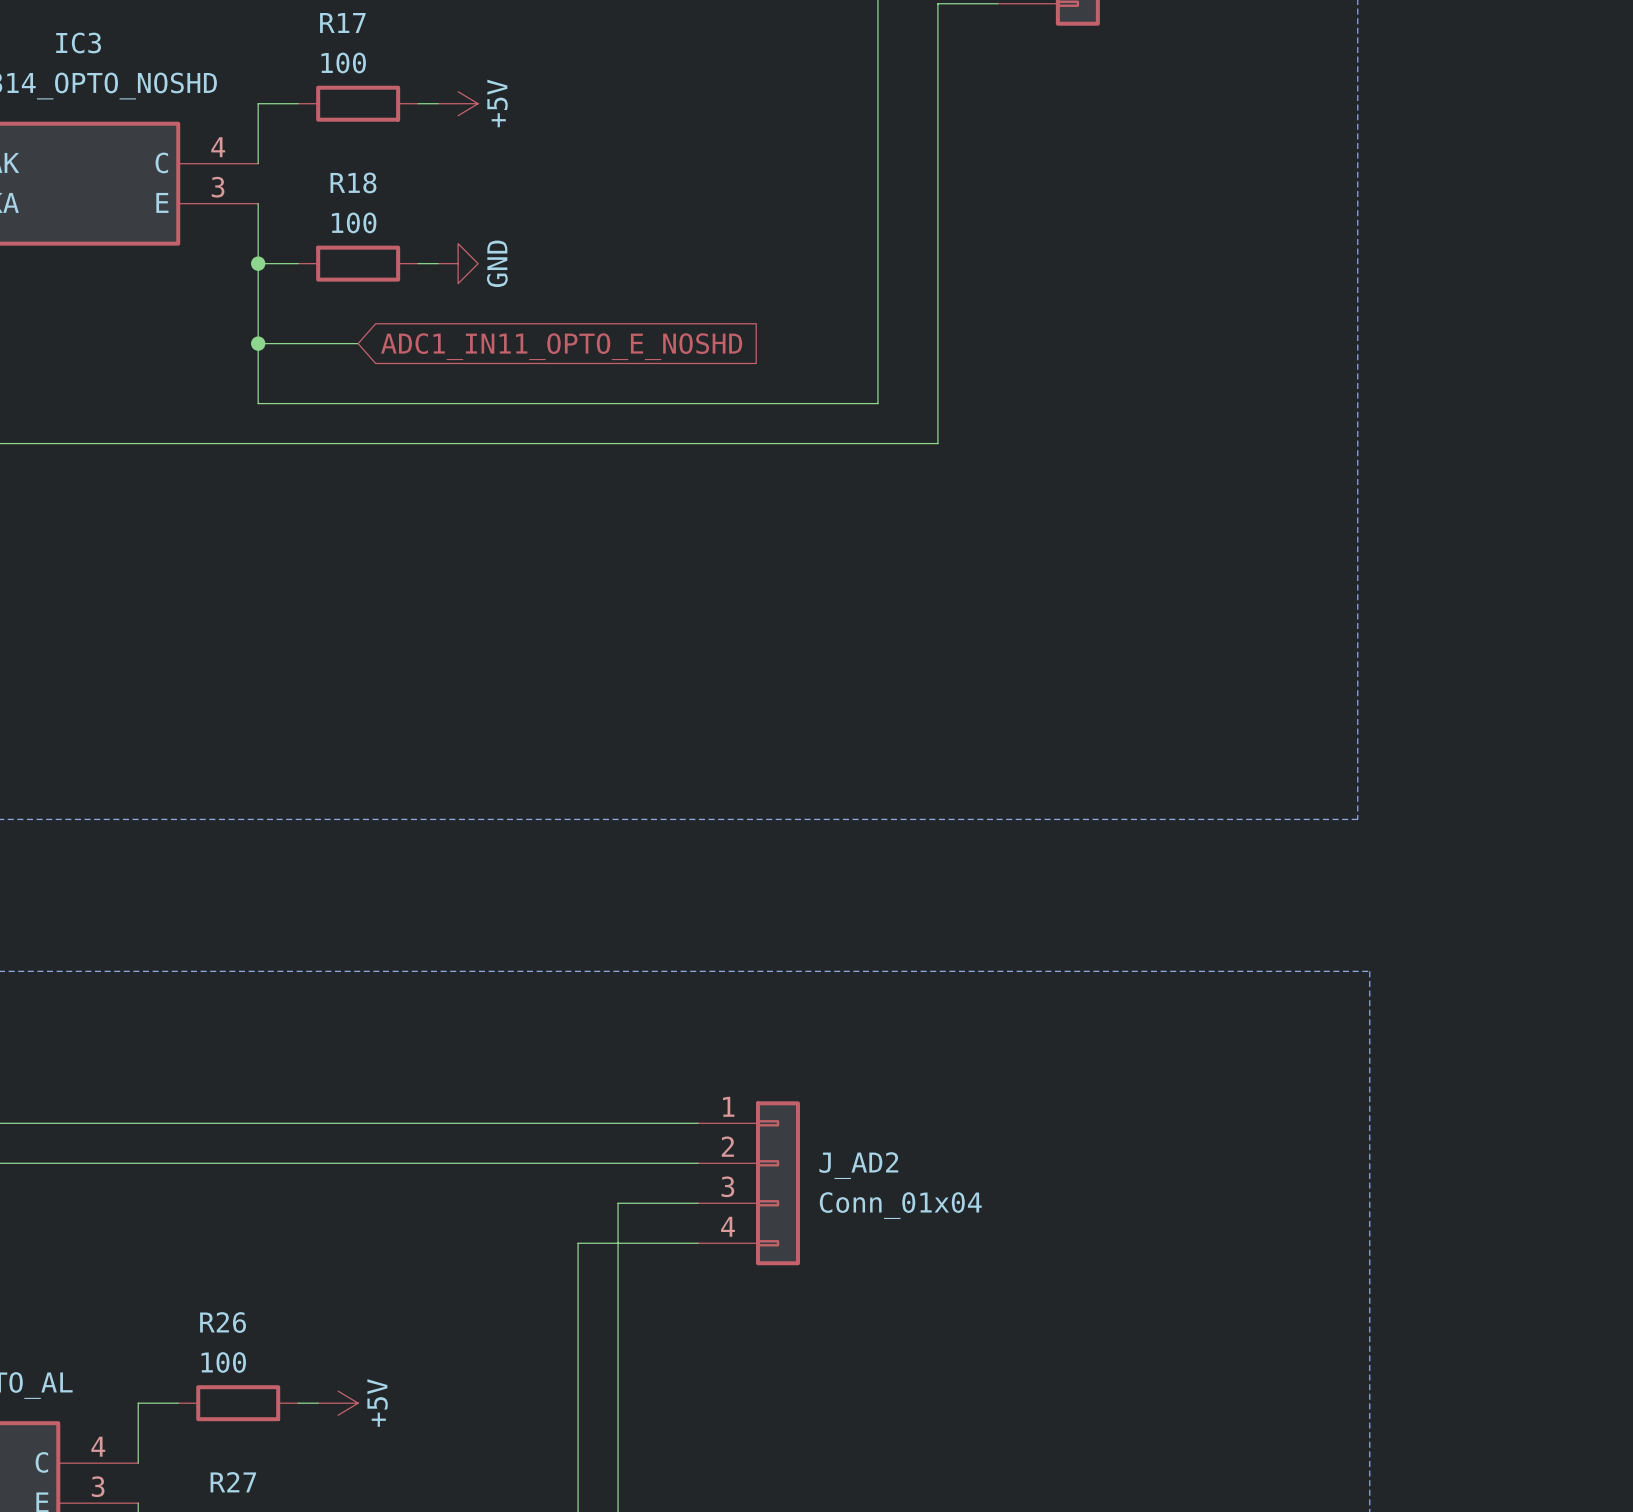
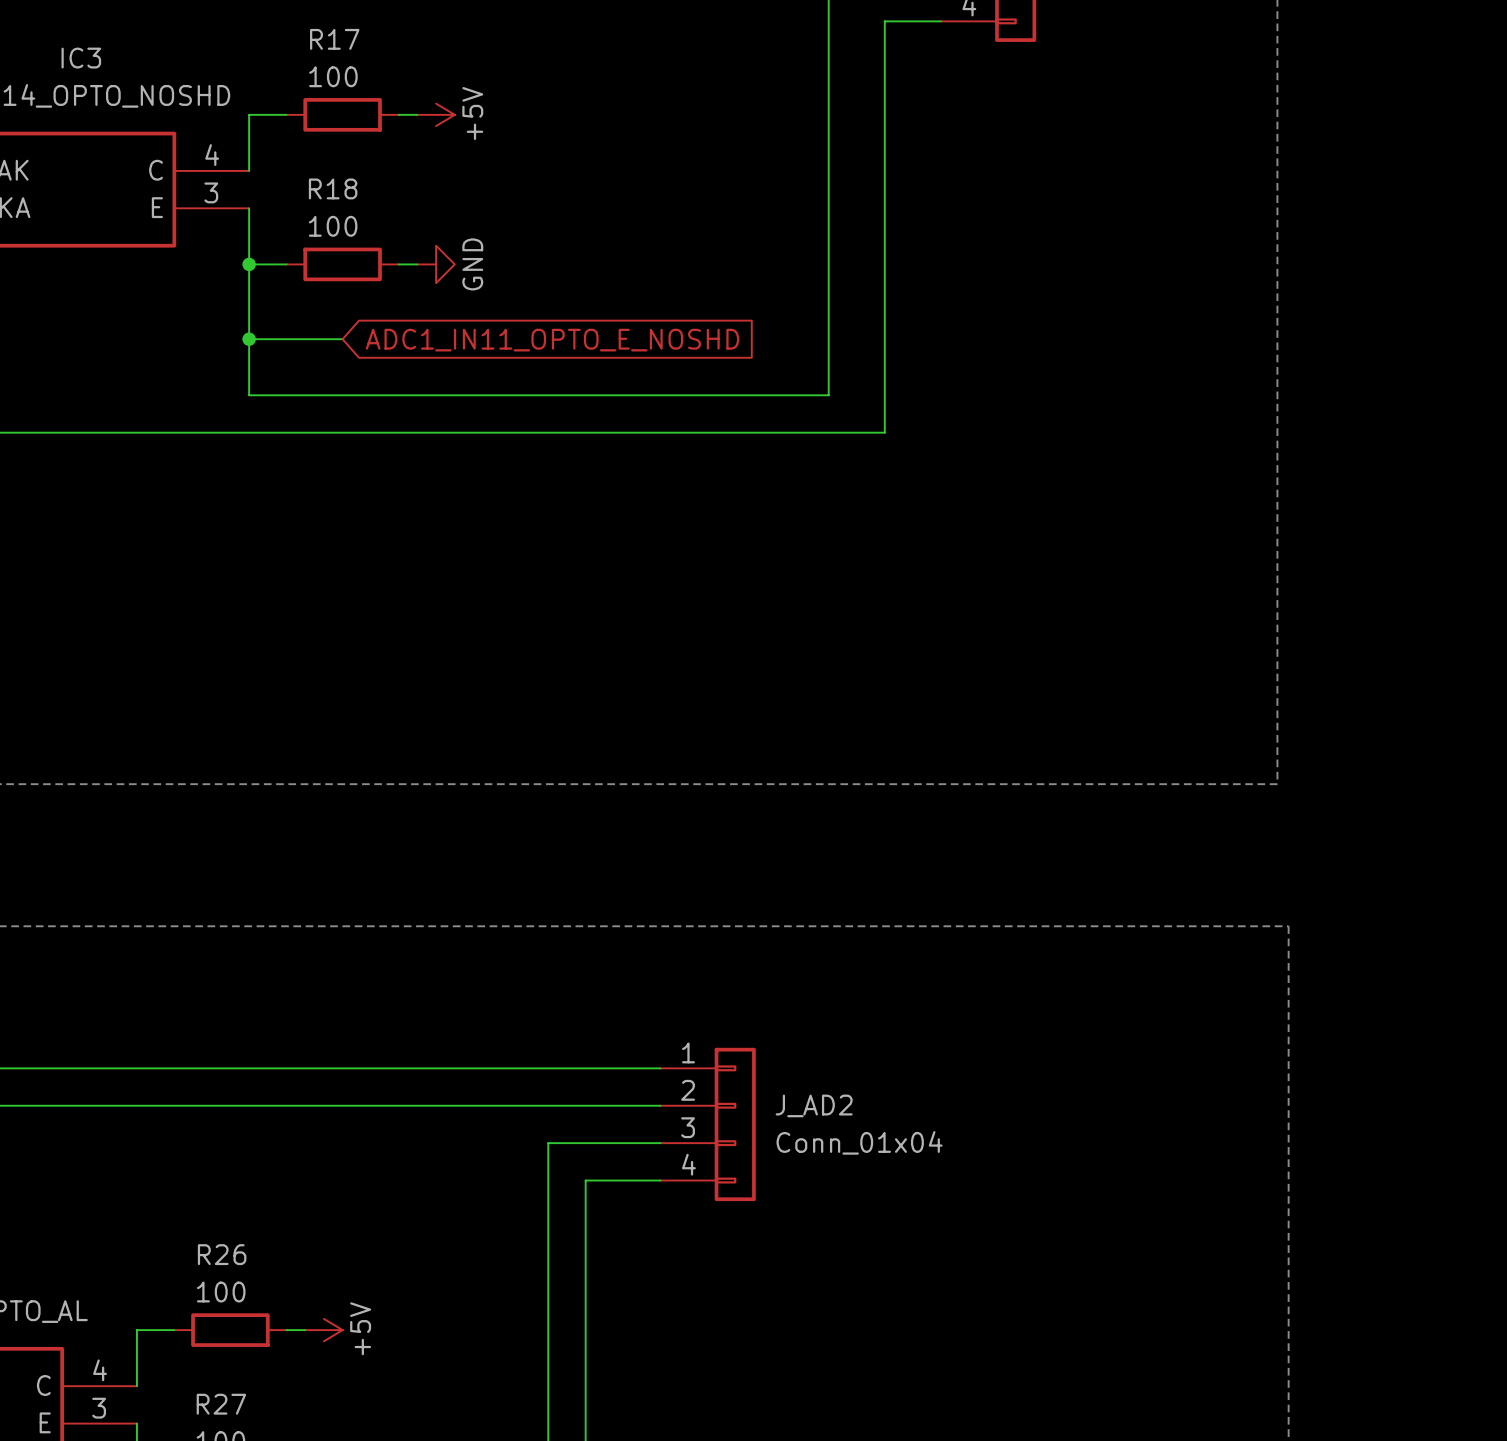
wire: (618, 1203) (618, 1243) (578, 1243) -> (585, 1143) (548, 1143) (548, 1180)

